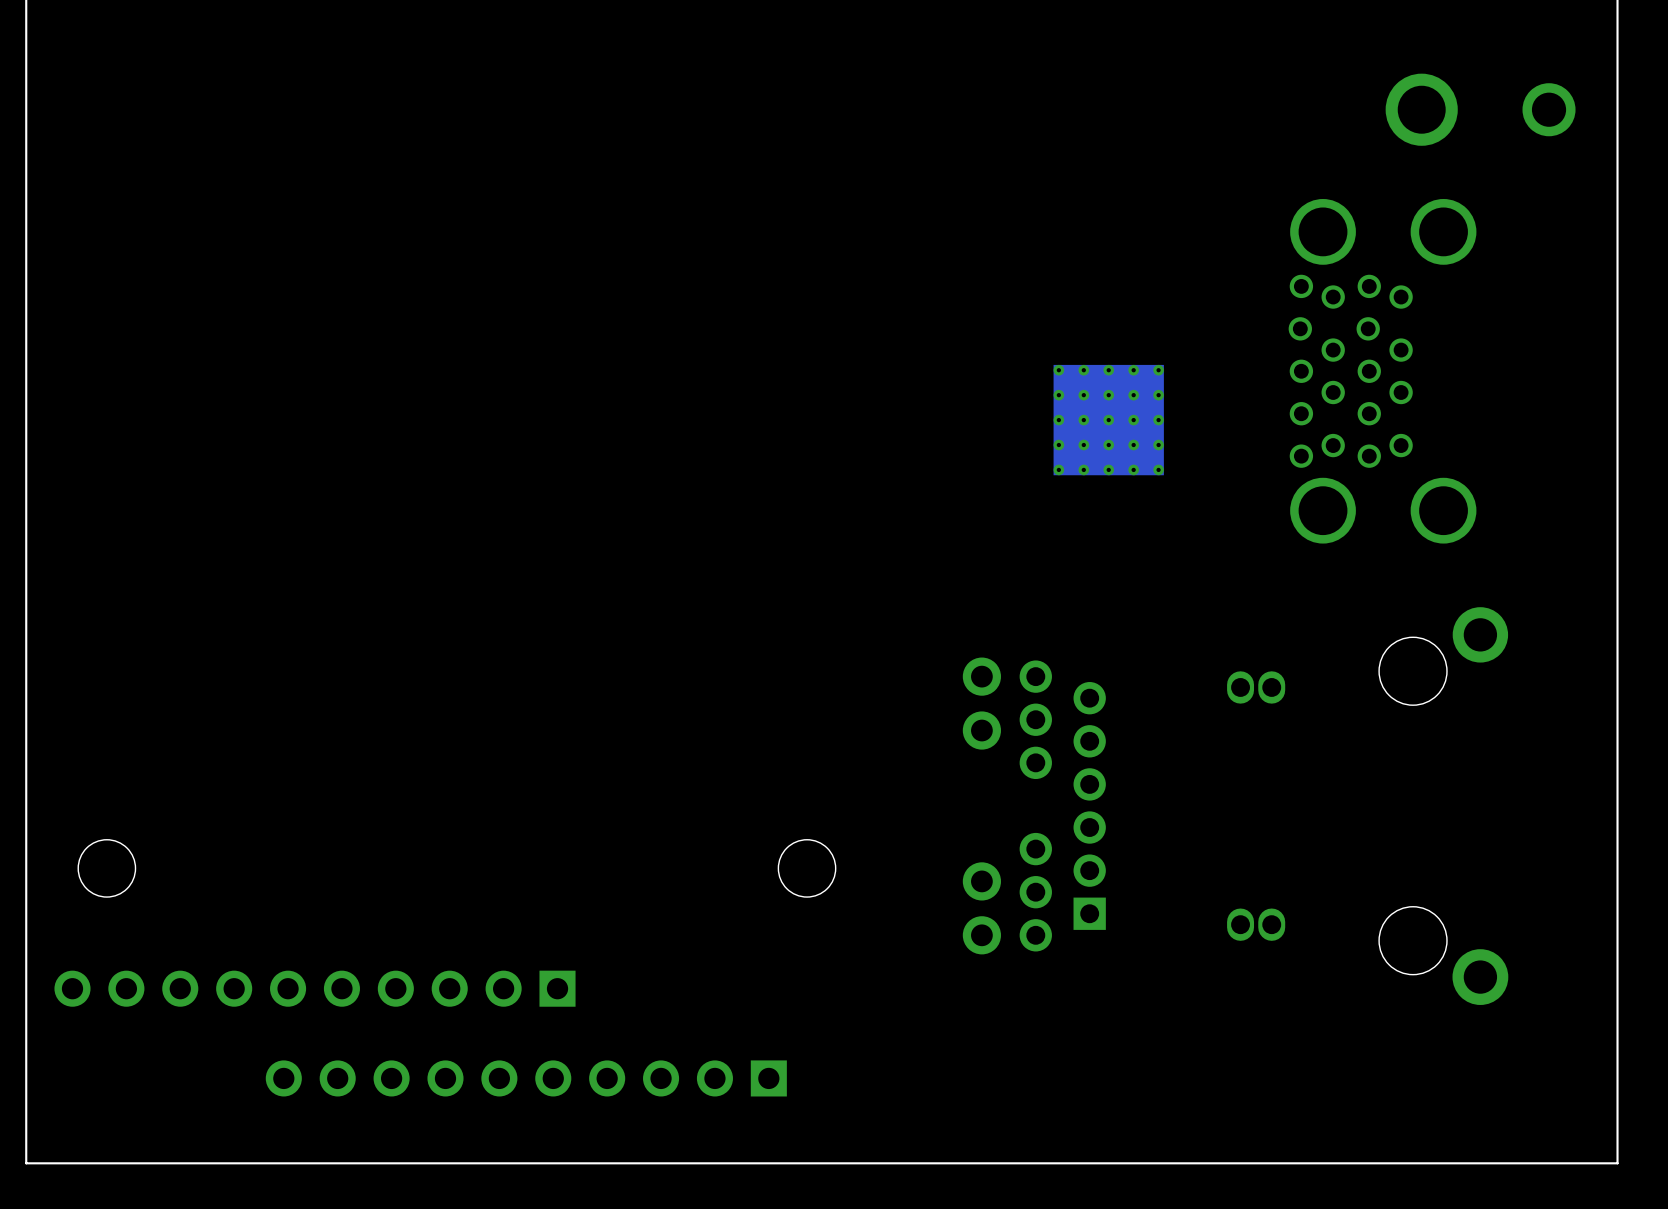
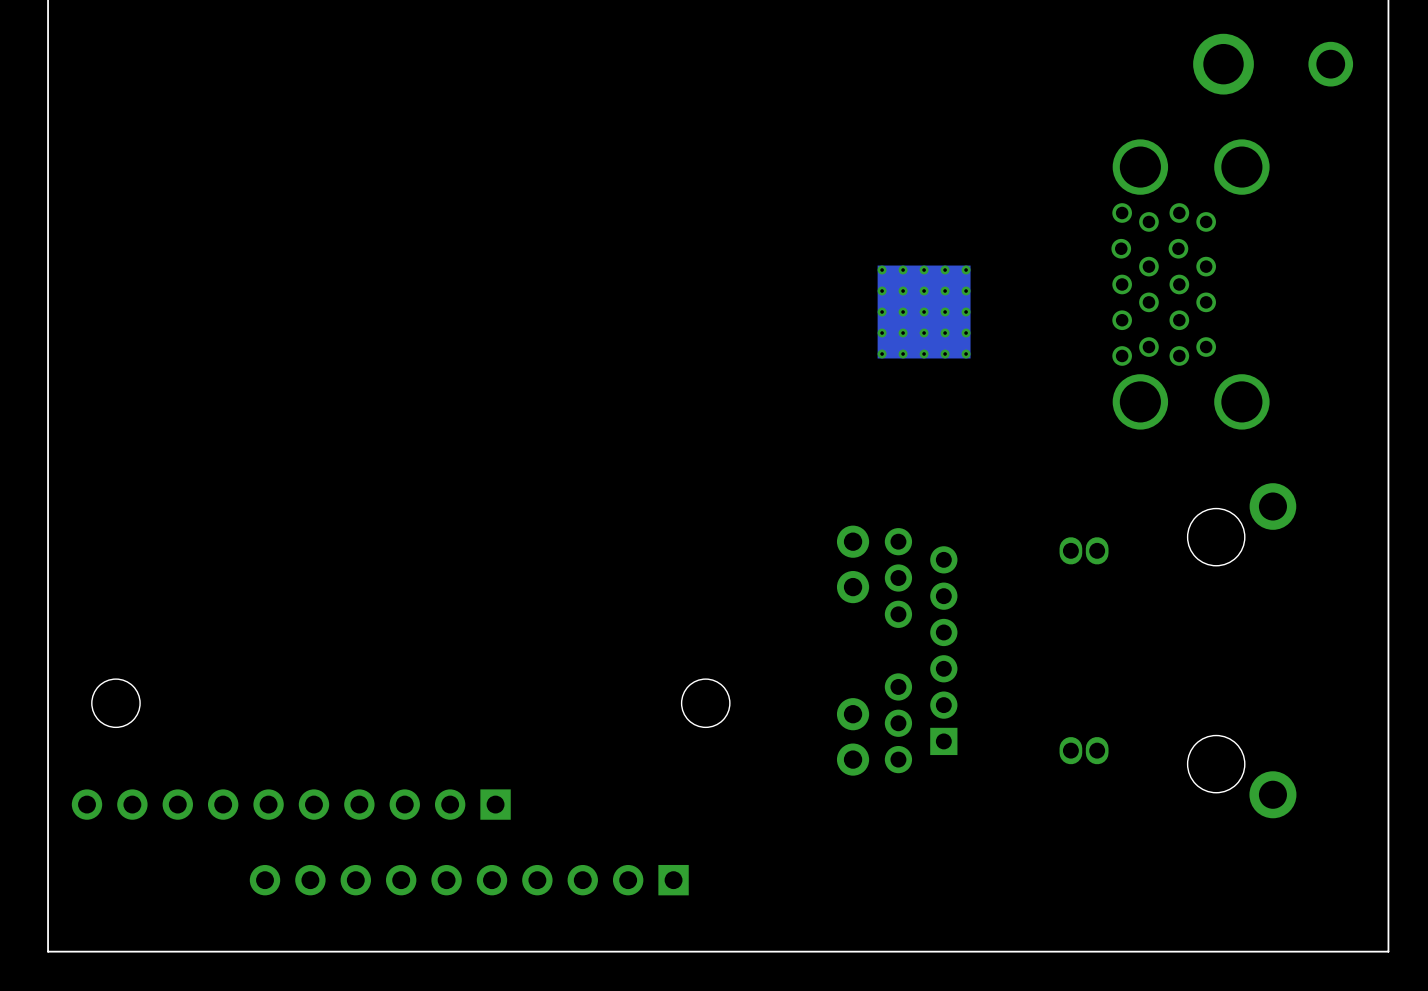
part position: (1108, 420) -> (924, 312)

